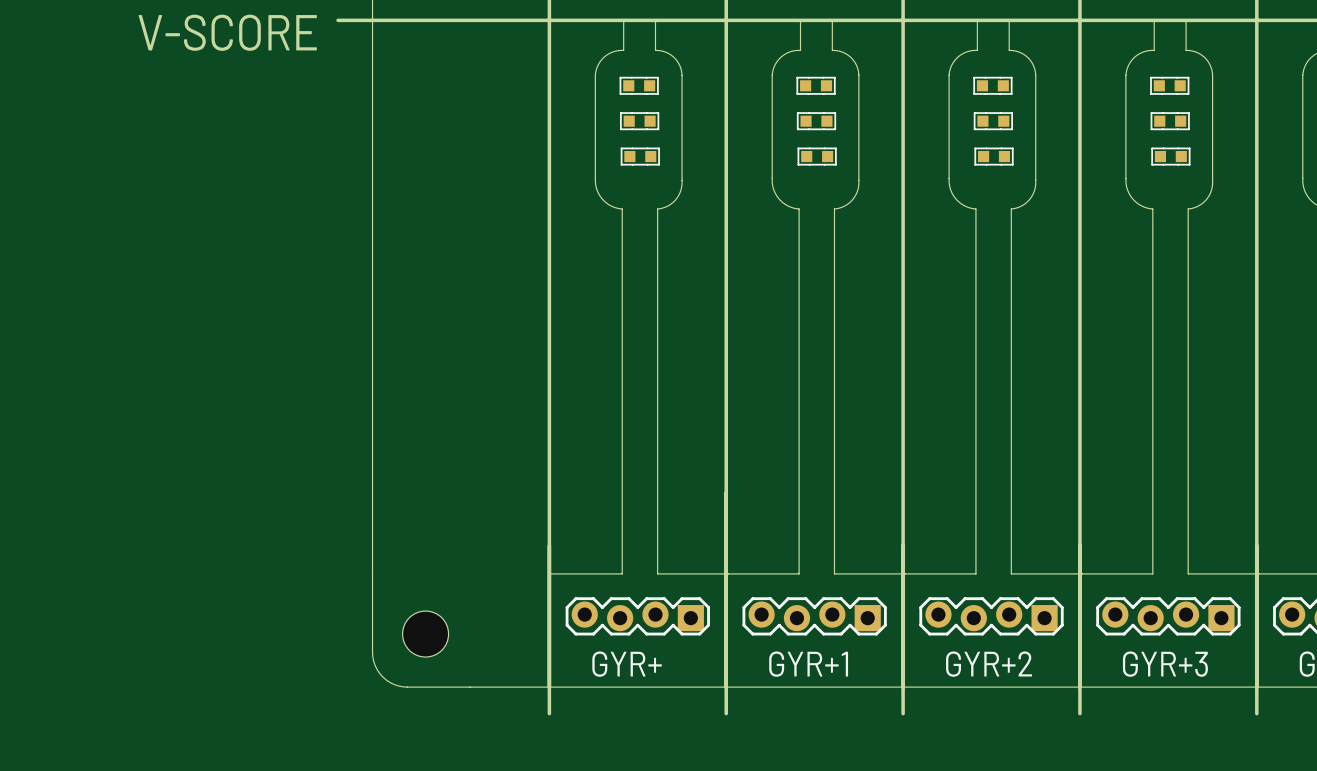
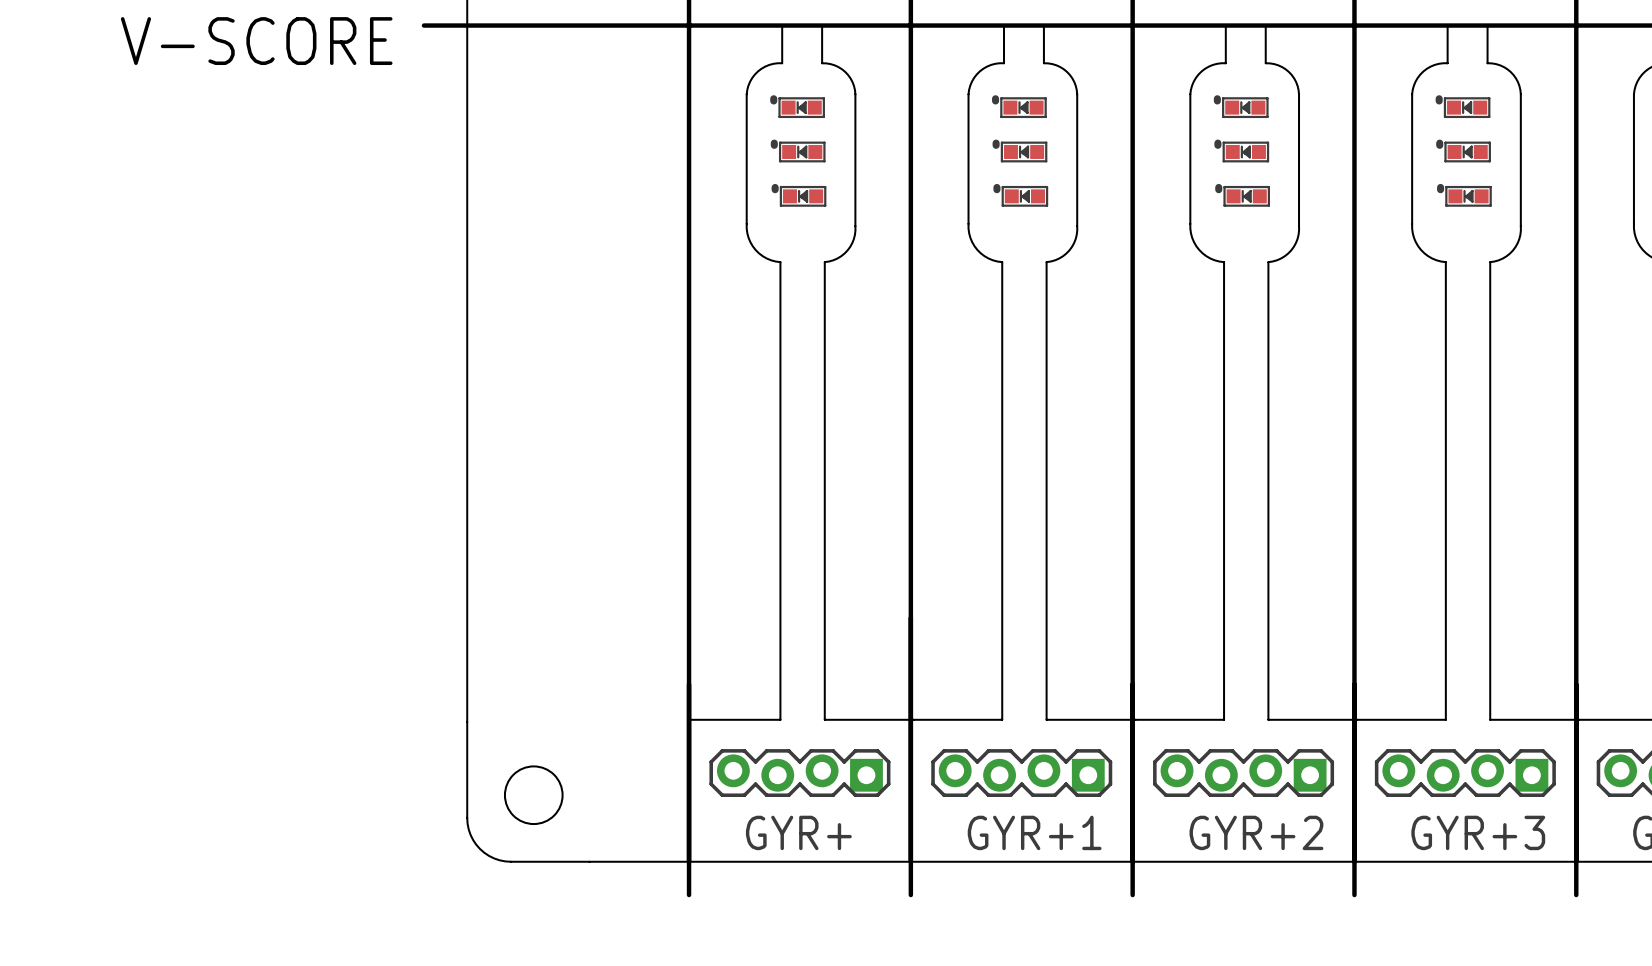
part footprint: [619, 76, 659, 95] -> [770, 95, 825, 119]
part footprint: [796, 76, 836, 95] -> [992, 95, 1047, 119]
part footprint: [973, 76, 1013, 95] -> [1213, 95, 1269, 119]
part footprint: [1150, 76, 1190, 95] -> [1435, 95, 1491, 119]
part footprint: [620, 112, 660, 131] -> [770, 139, 826, 163]
part footprint: [796, 112, 837, 131] -> [992, 139, 1048, 163]
part footprint: [973, 112, 1013, 131] -> [1214, 139, 1270, 163]
part footprint: [1150, 112, 1190, 131] -> [1436, 139, 1491, 163]
part footprint: [620, 147, 660, 166] -> [771, 183, 827, 207]
part footprint: [797, 147, 837, 166] -> [993, 183, 1049, 207]
part footprint: [974, 147, 1014, 166] -> [1215, 183, 1271, 207]
part footprint: [1151, 147, 1191, 166] -> [1437, 183, 1492, 207]

